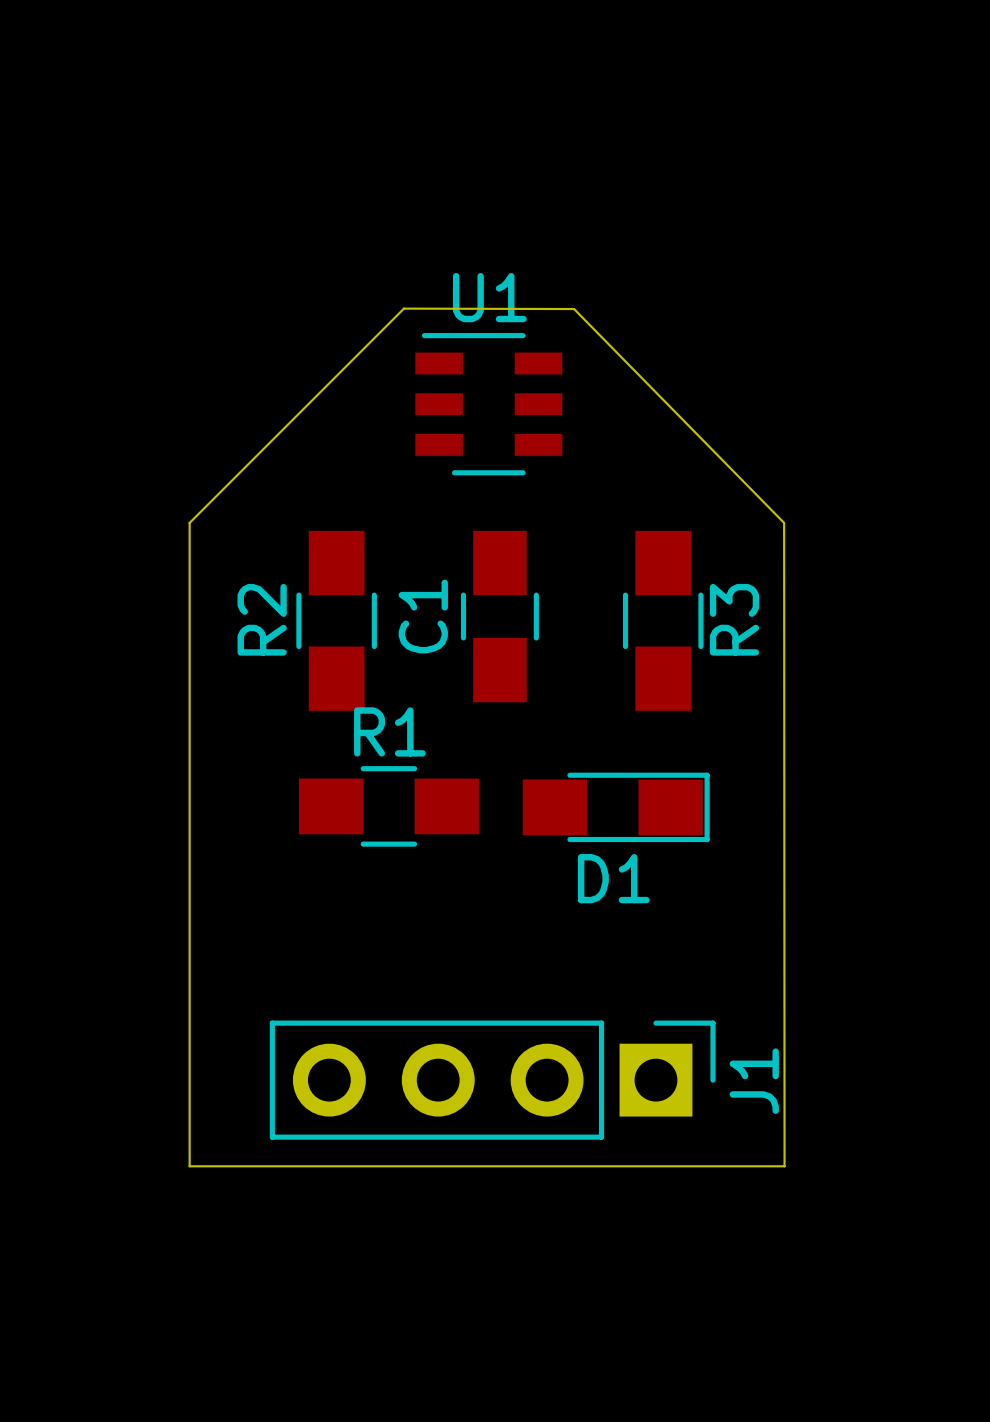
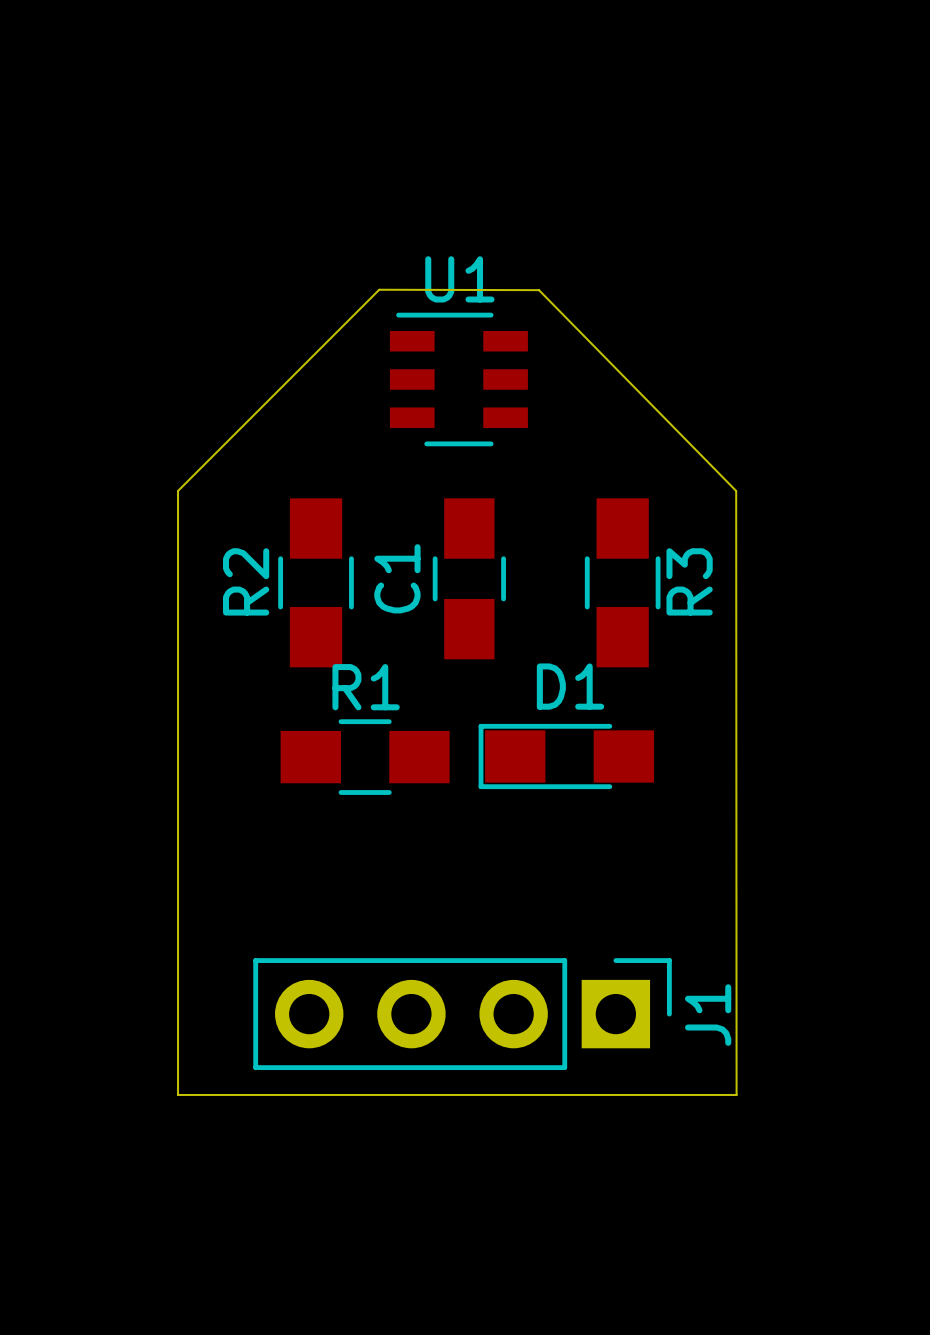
D1 rotation: 0° (616, 807) -> 180° (566, 756)

